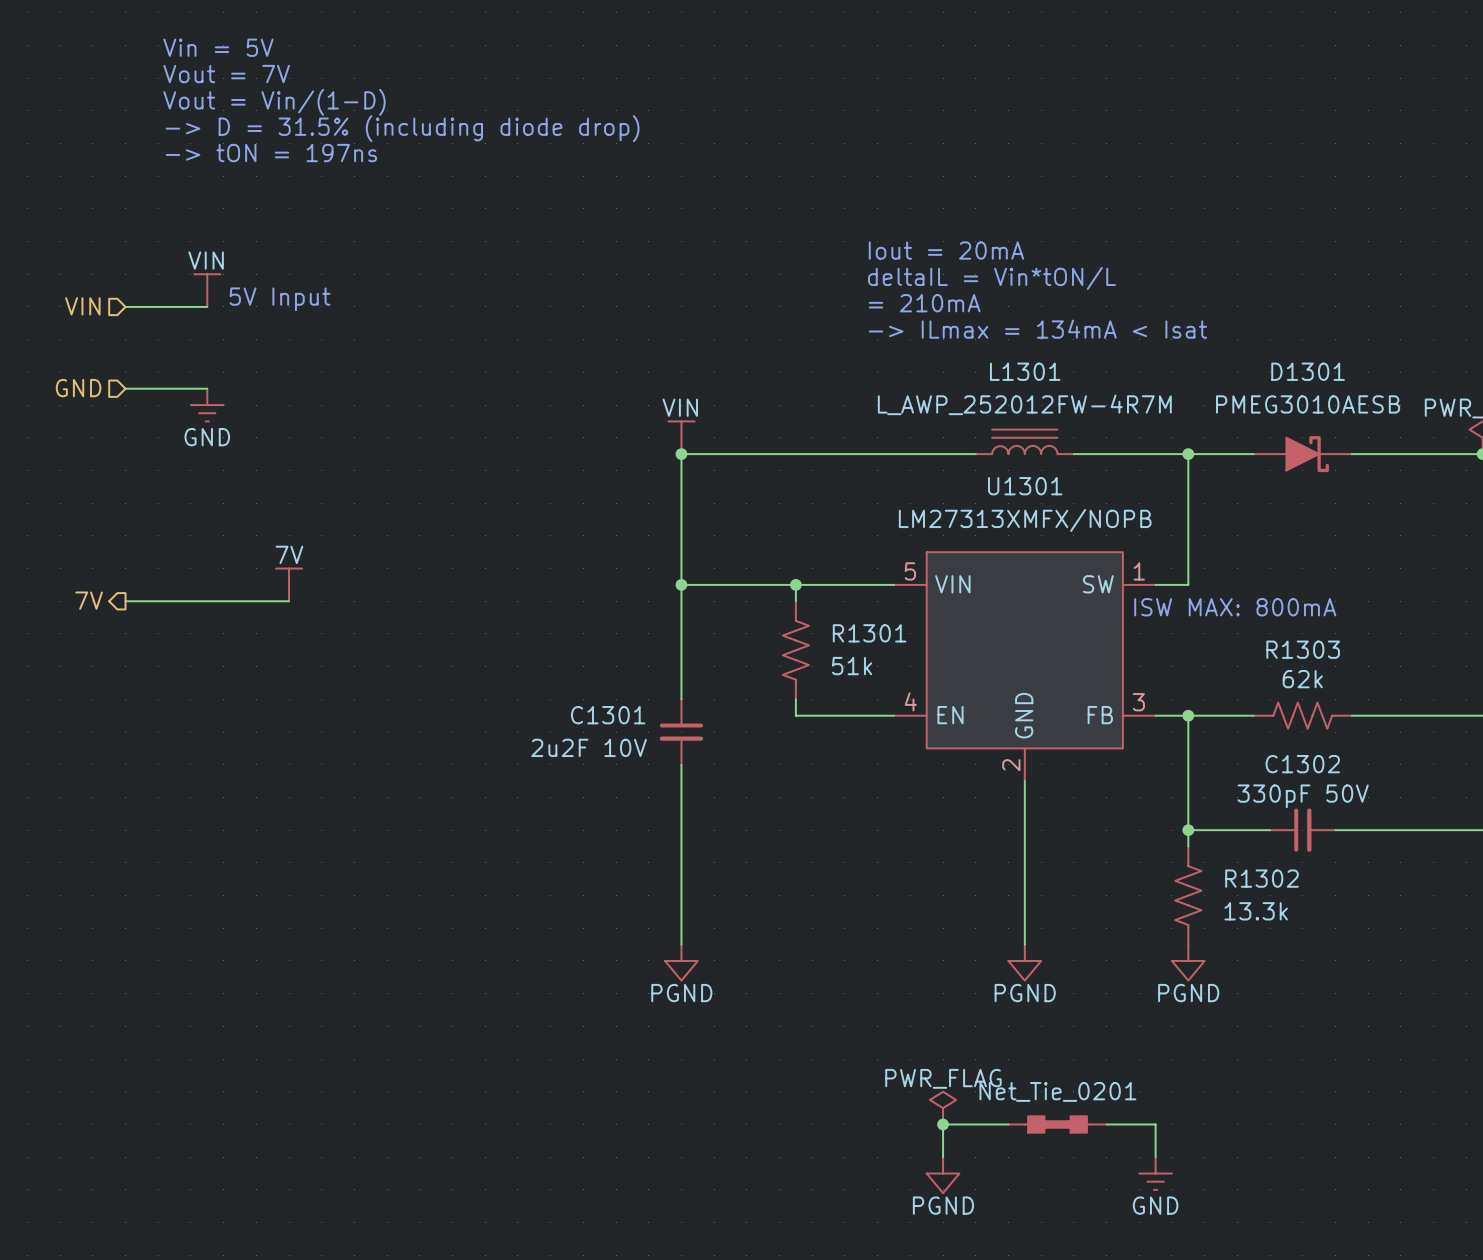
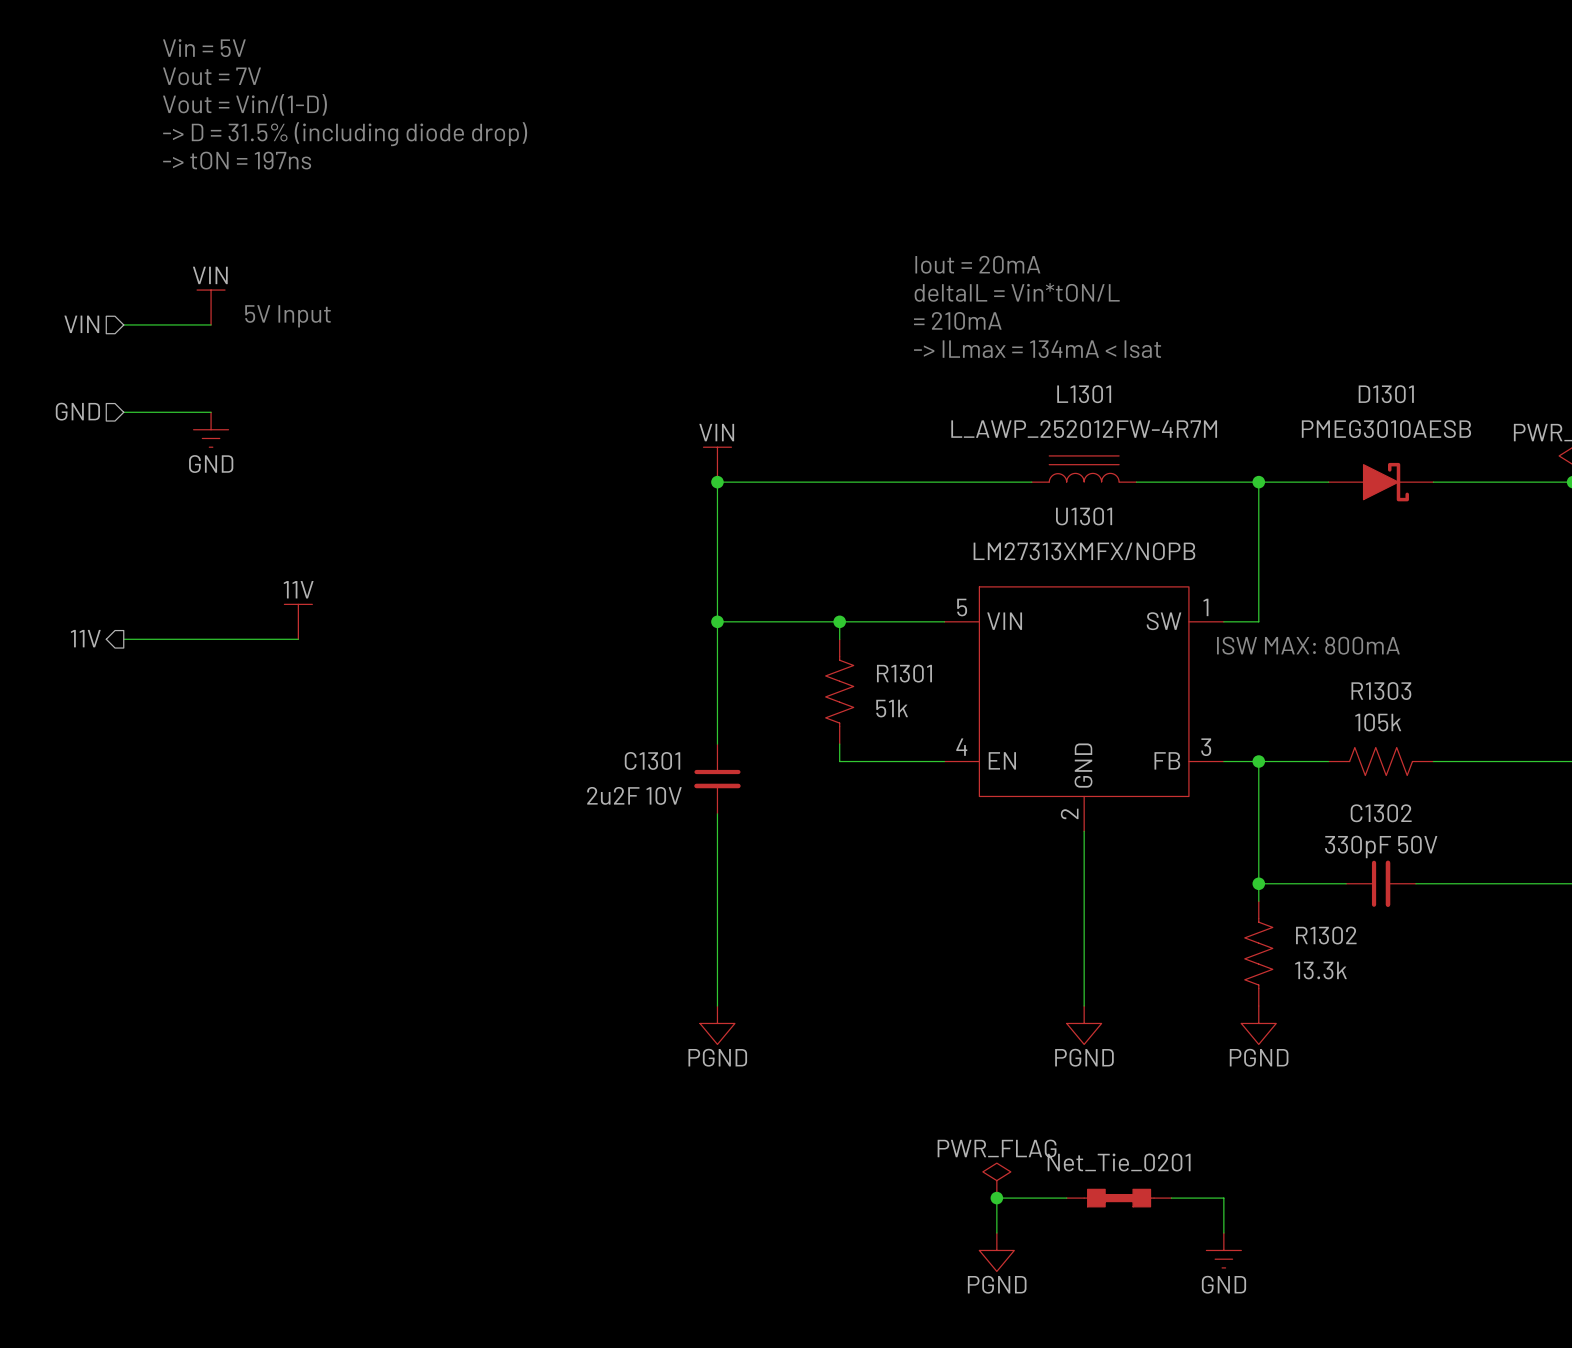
power symbol: 7V (289, 584) -> 11V (298, 621)
hierarchical label: 7V (89, 600) -> 11V (85, 638)
R1303 value: 62k (1302, 679) -> 105k (1378, 722)

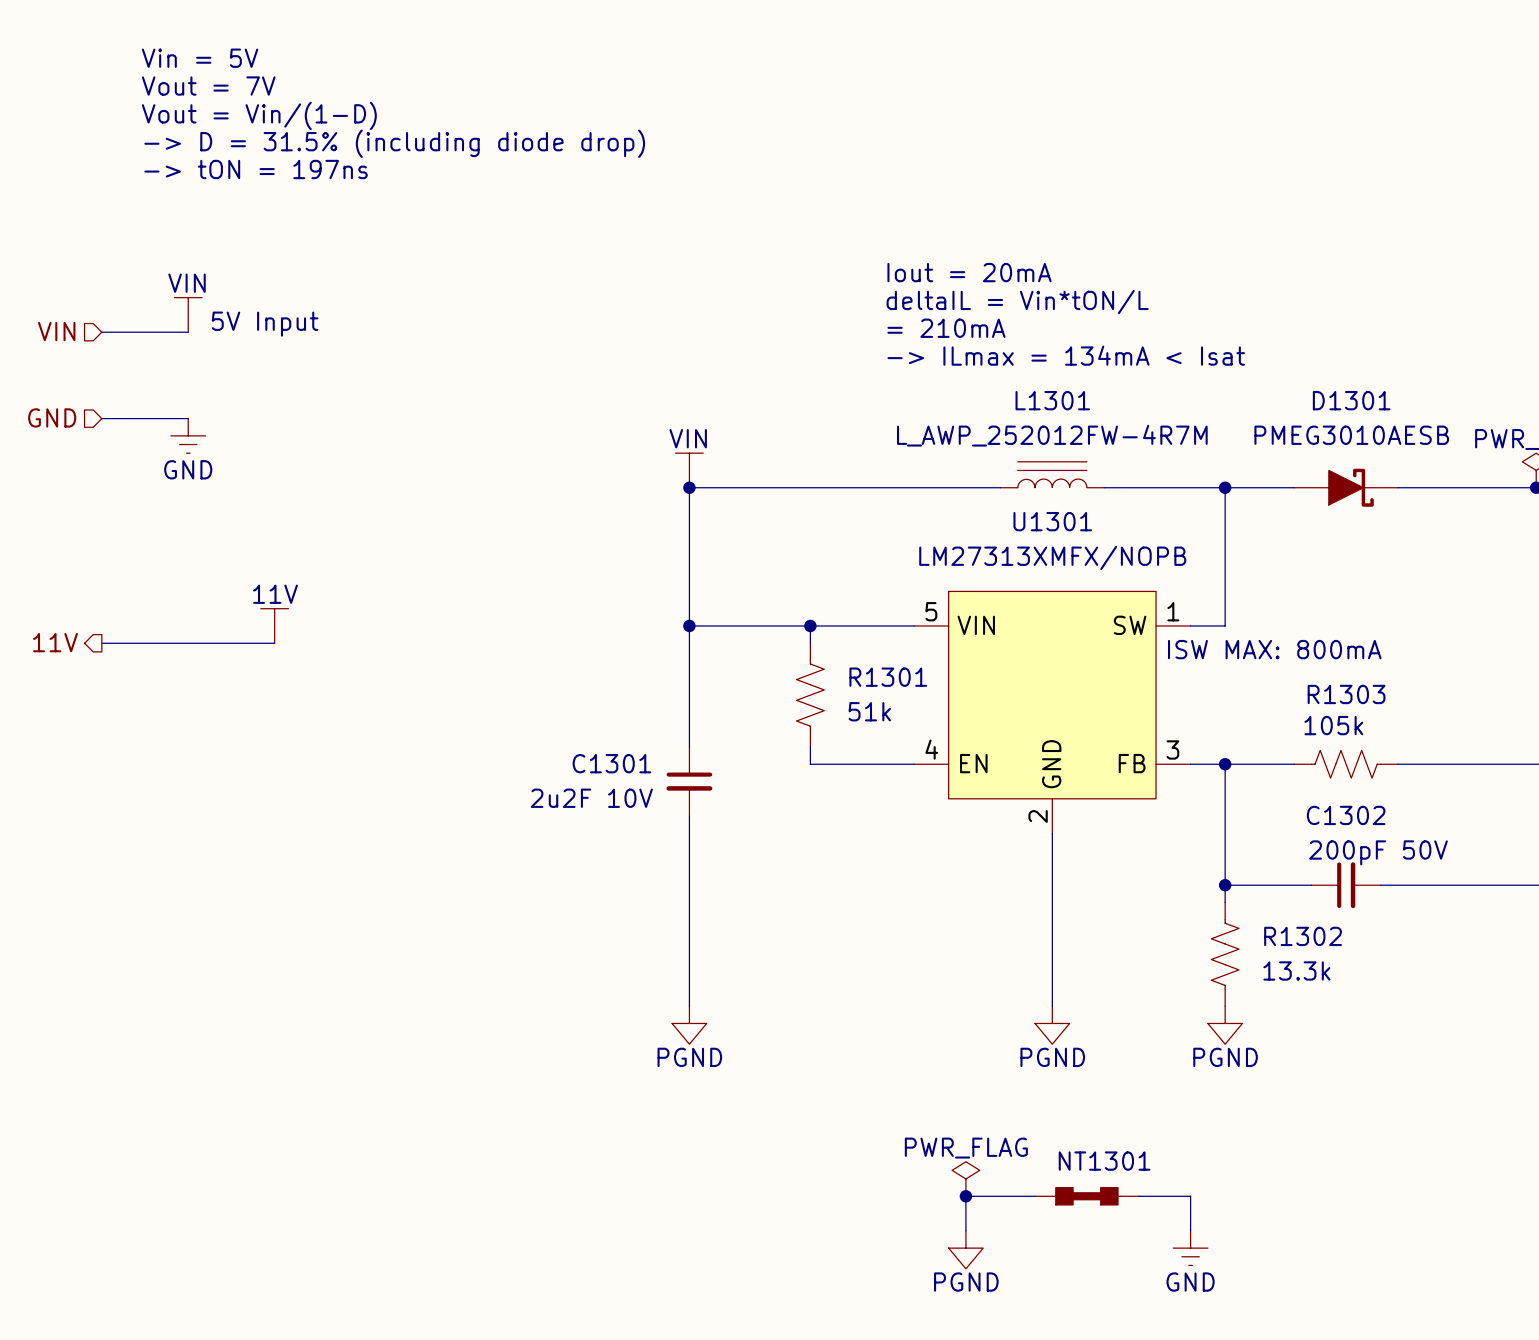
C1302 value: 330pF 50V (1381, 847) -> 200pF 50V (1378, 852)
NT1301 value: Net_Tie_0201 (1119, 1162) -> none
NT1301 name: none -> NT1301 (1104, 1161)

